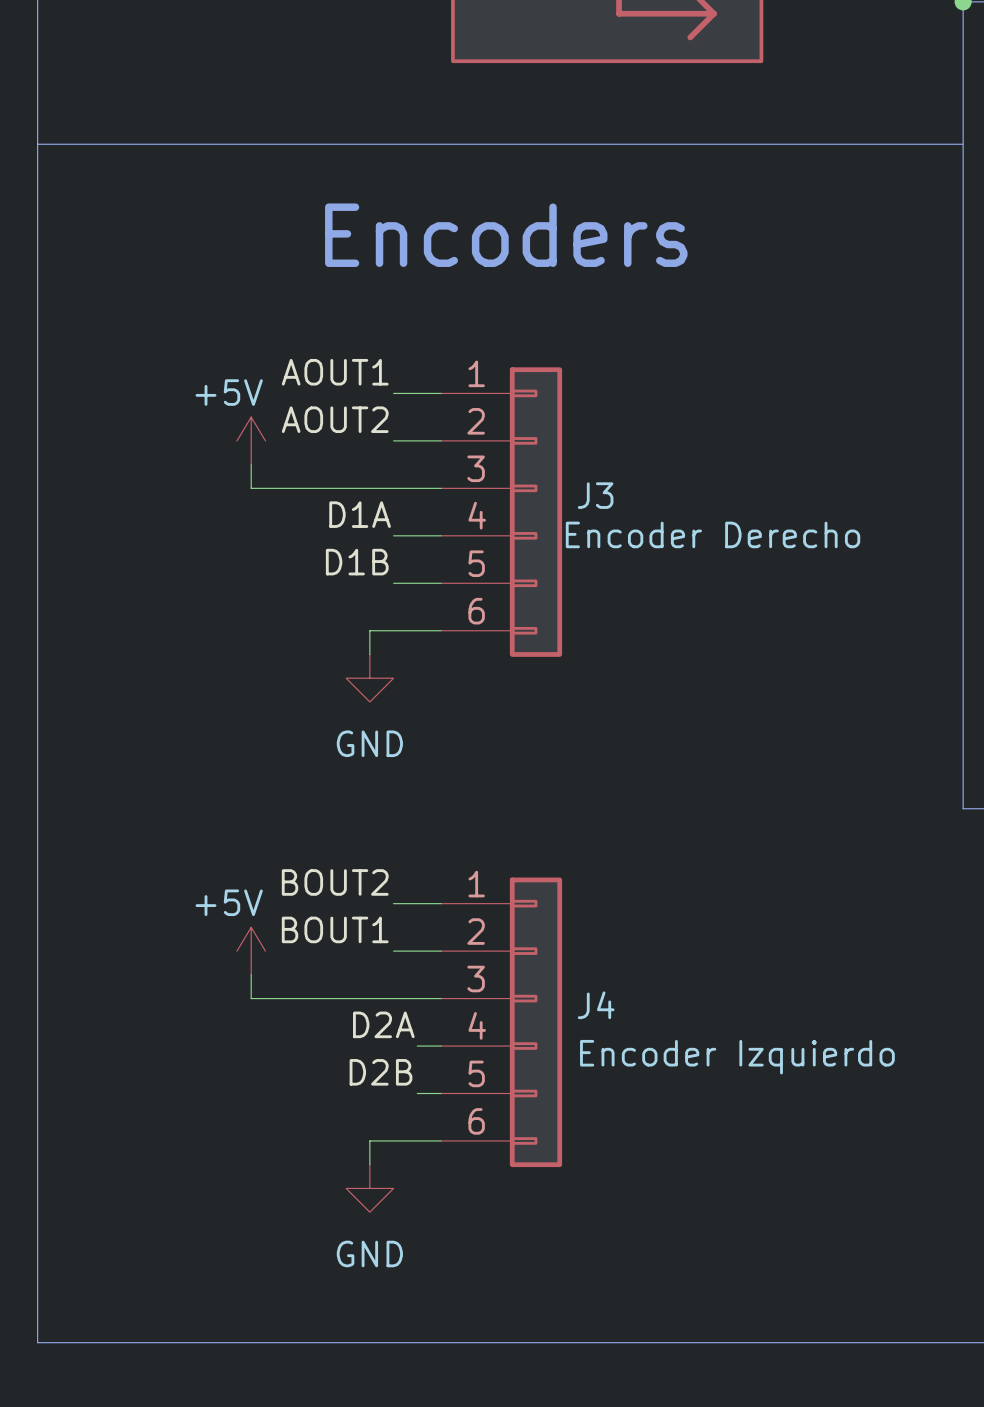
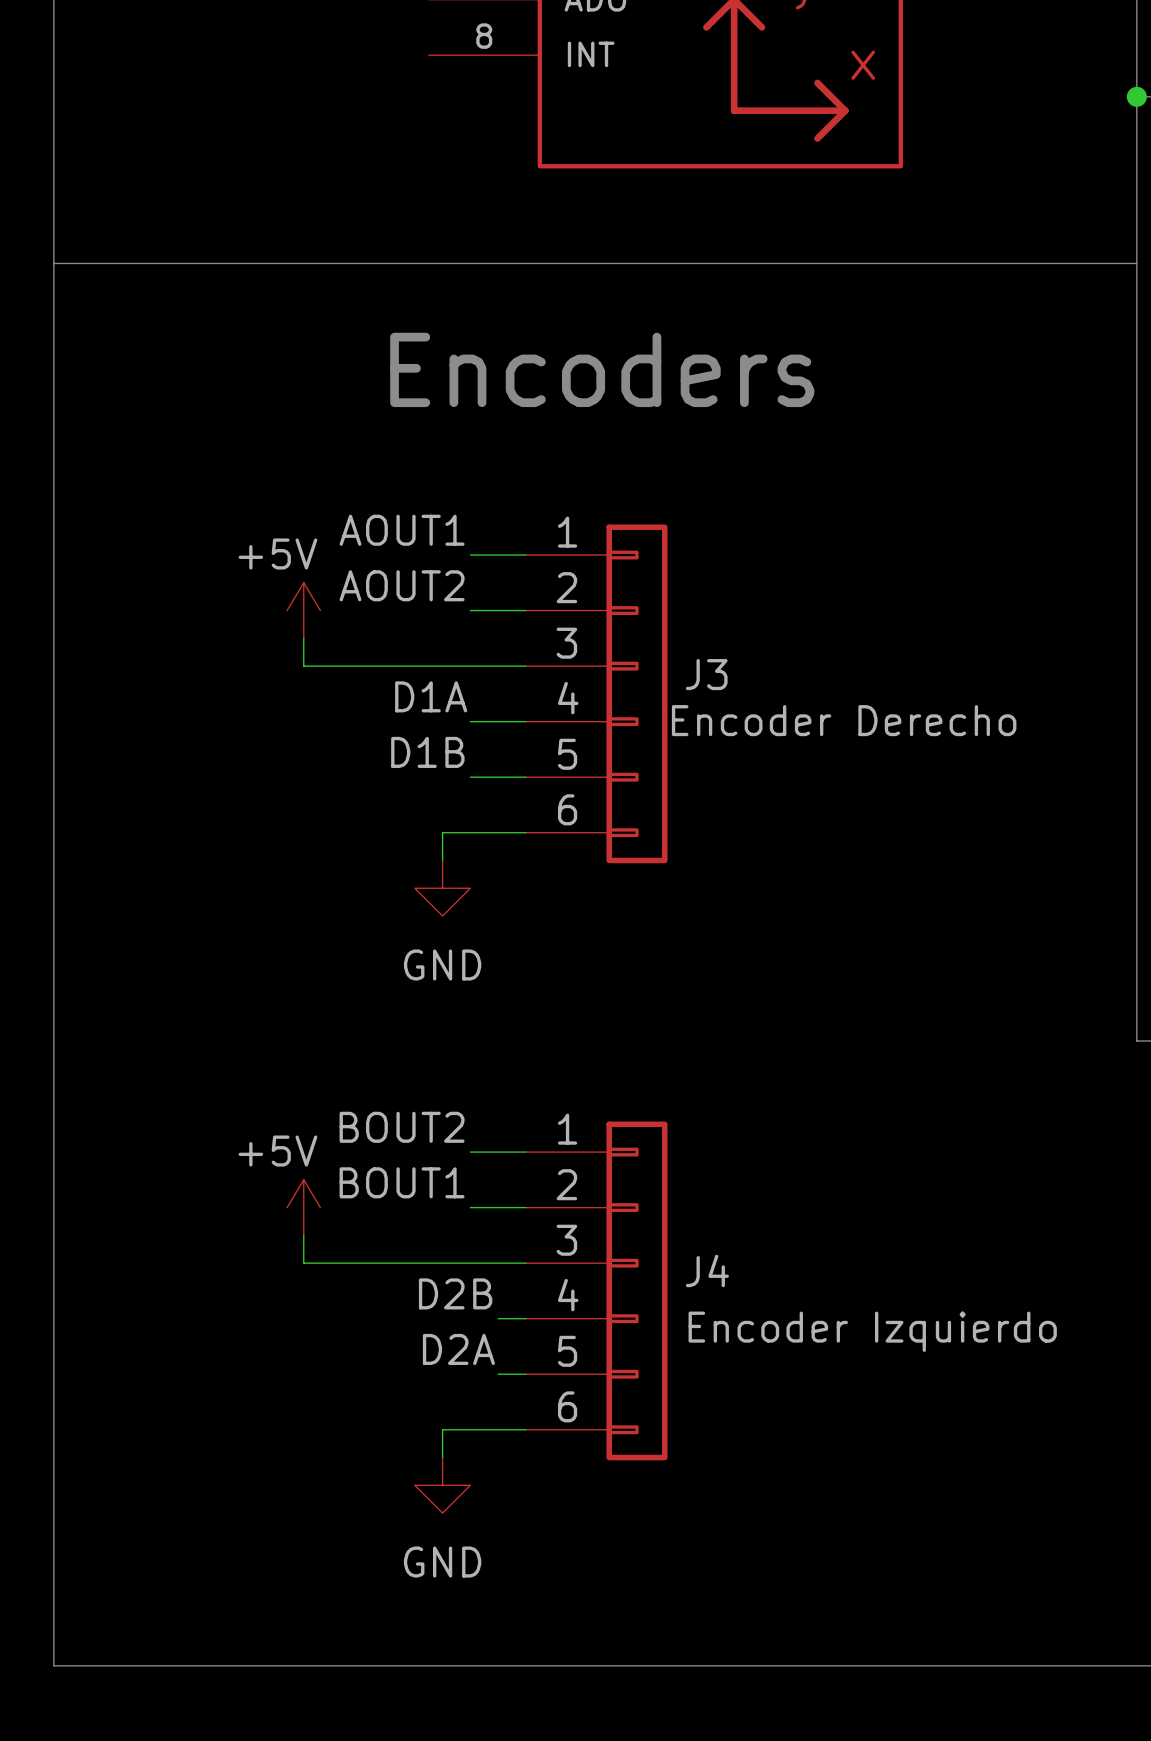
label: D2A (383, 1024) -> D2B (455, 1293)
label: D2B (380, 1072) -> D2A (458, 1349)

